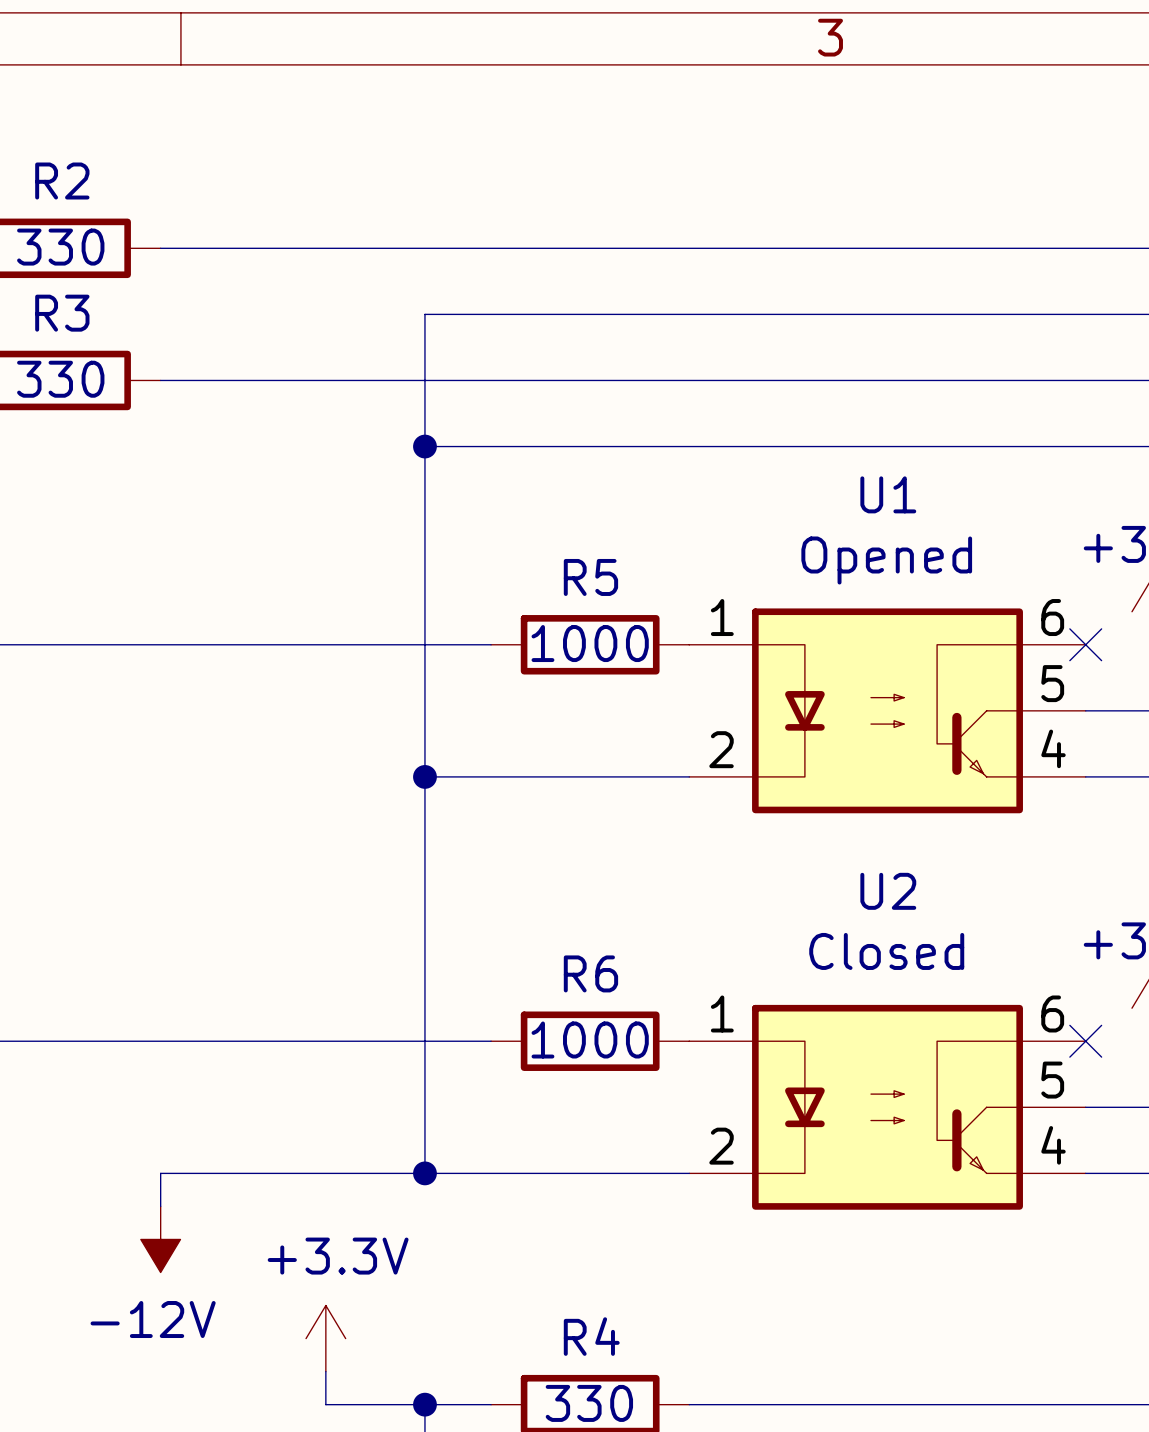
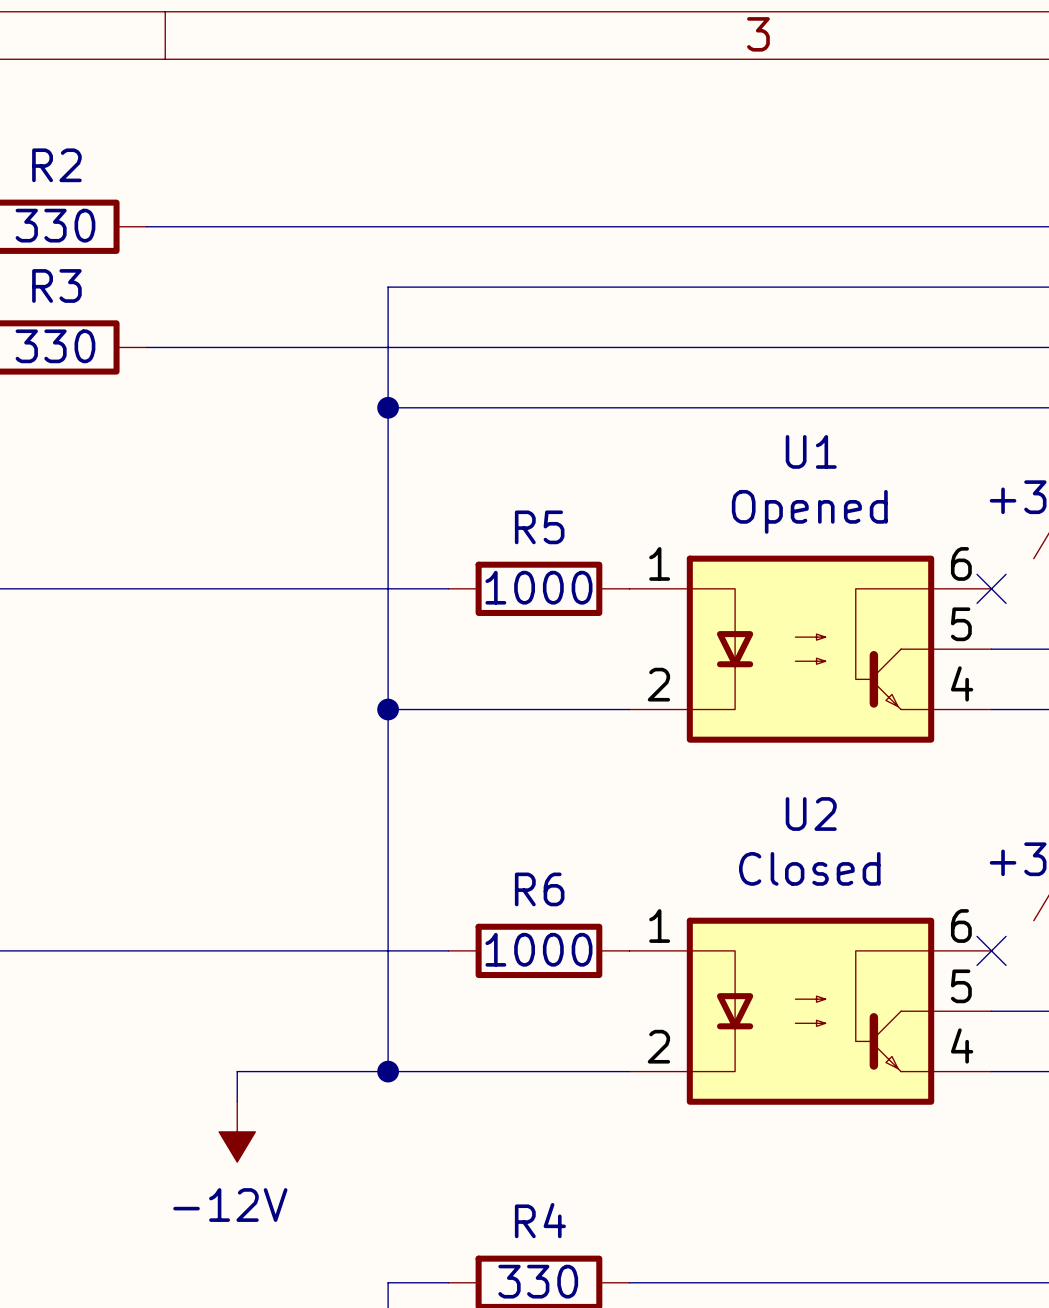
wire: (259, 1173) (160, 1173) (160, 1206) -> (237, 1071) (237, 1101)
power symbol position: -12V (160, 1239) -> -12V (237, 1131)
power symbol: +3.3V (325, 1338) -> none
wire: (325, 1371) (325, 1404) (424, 1404) -> none
junction: (424, 1404) -> none

